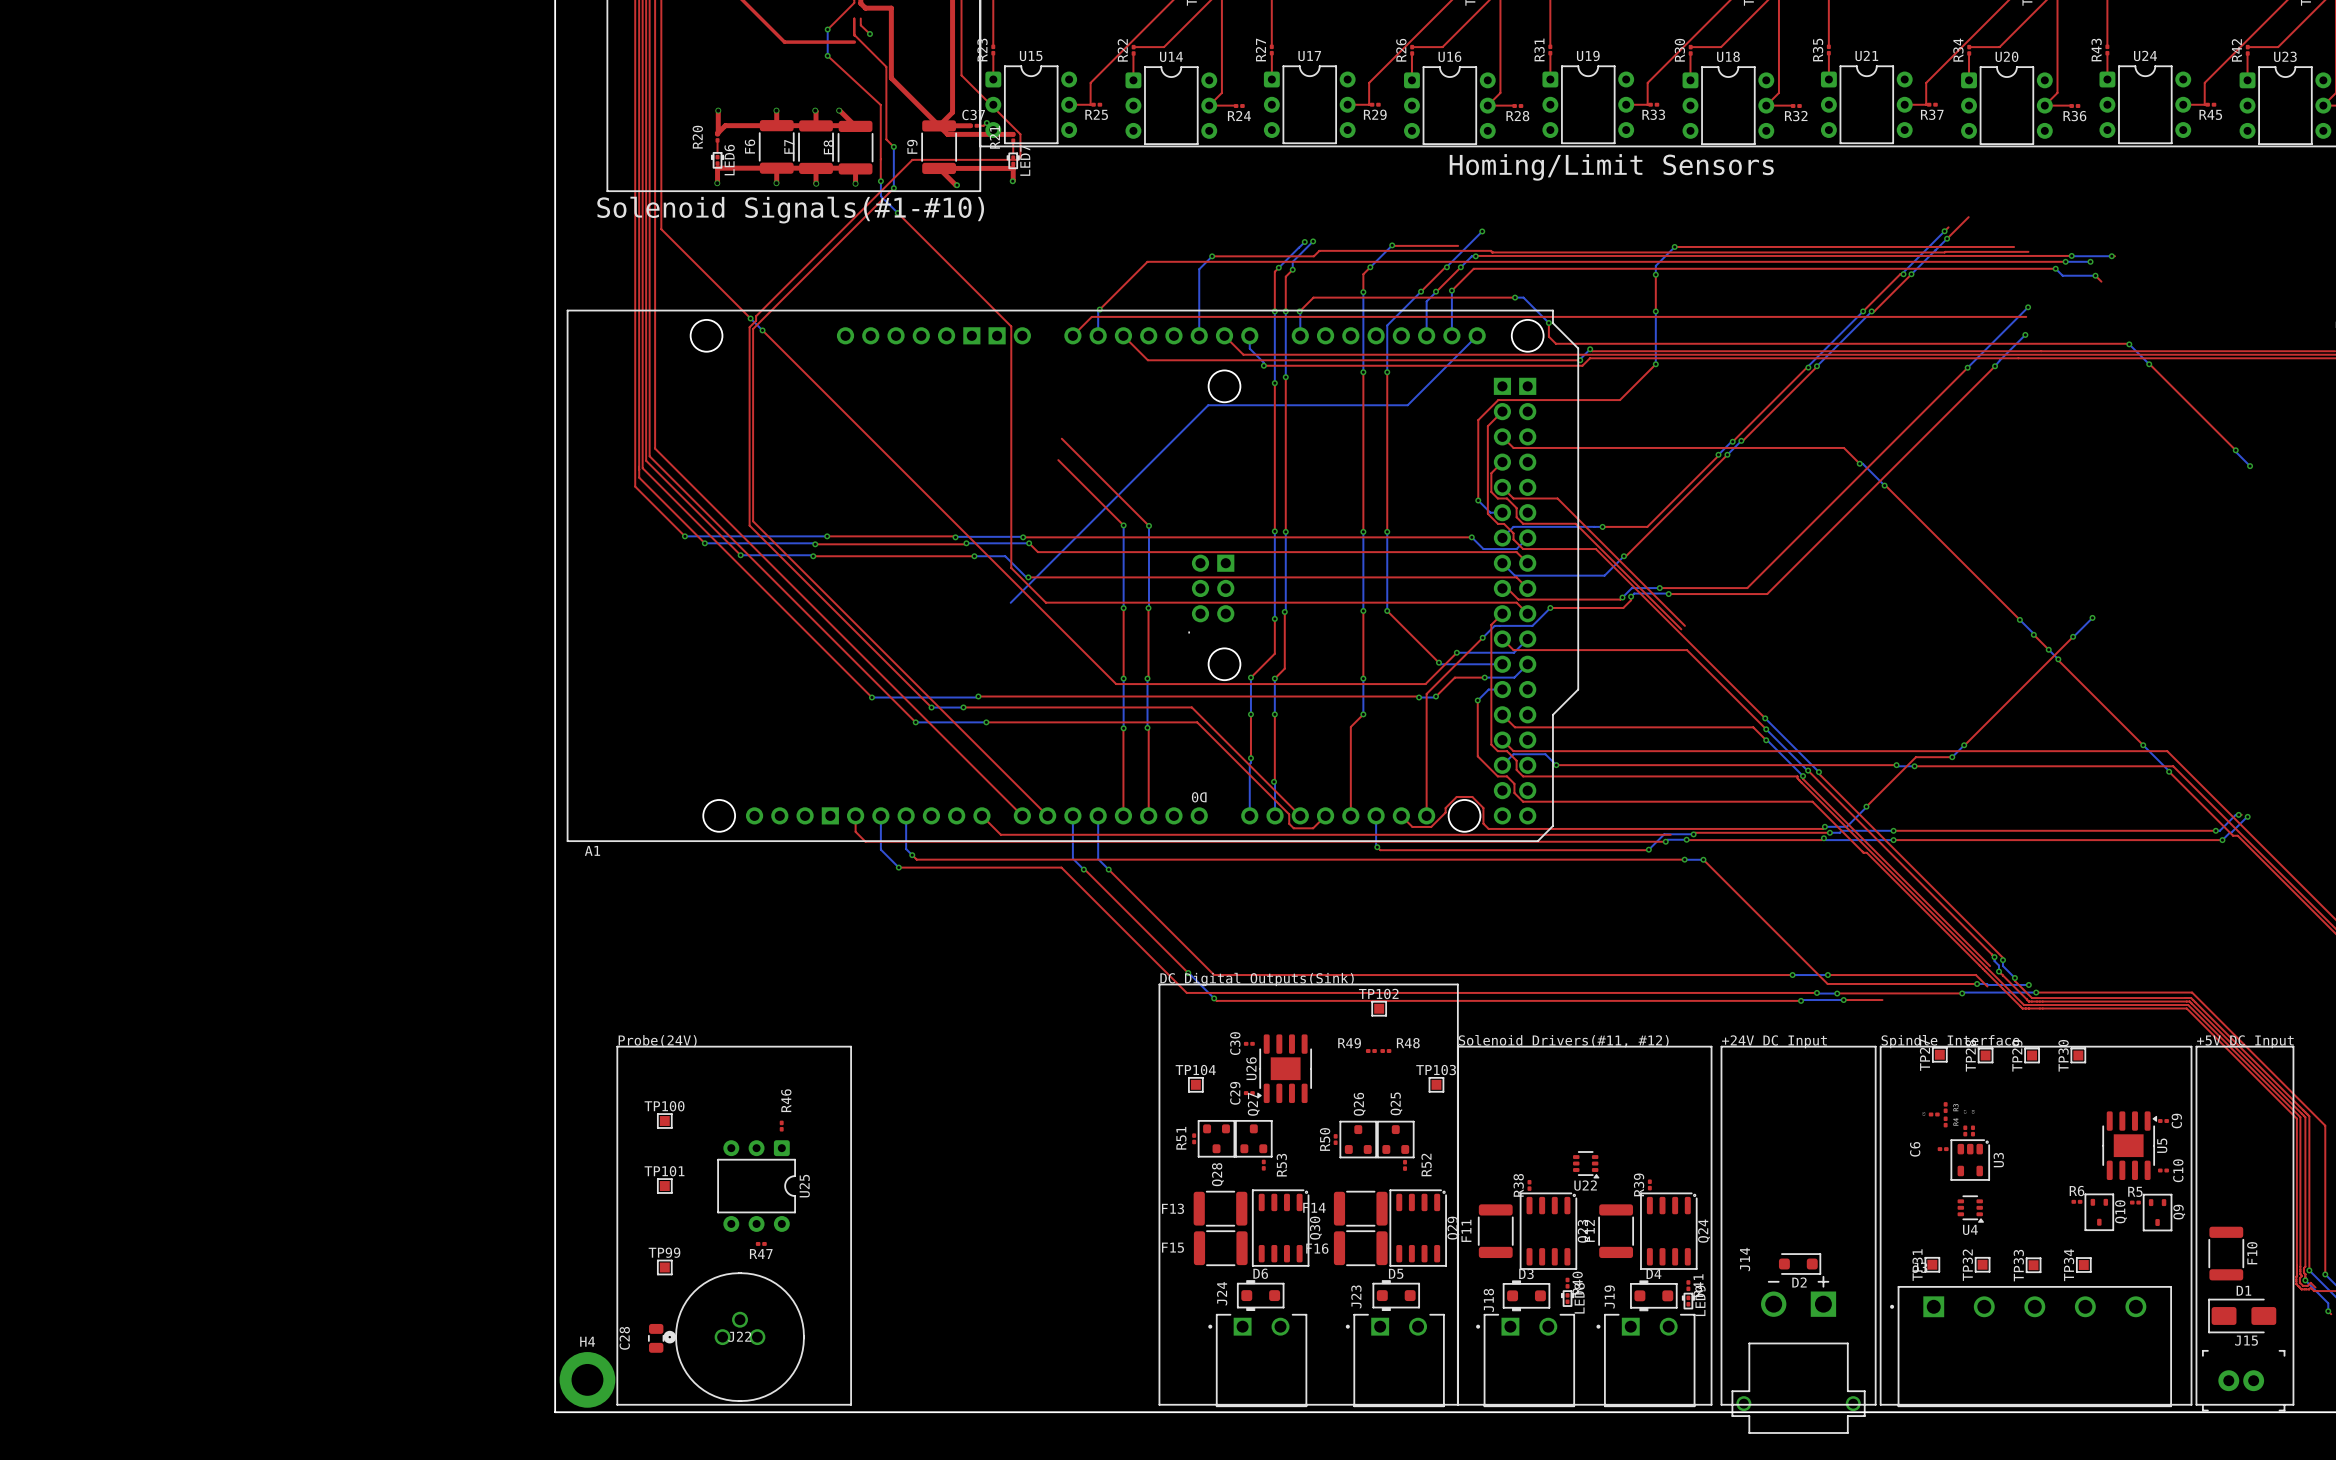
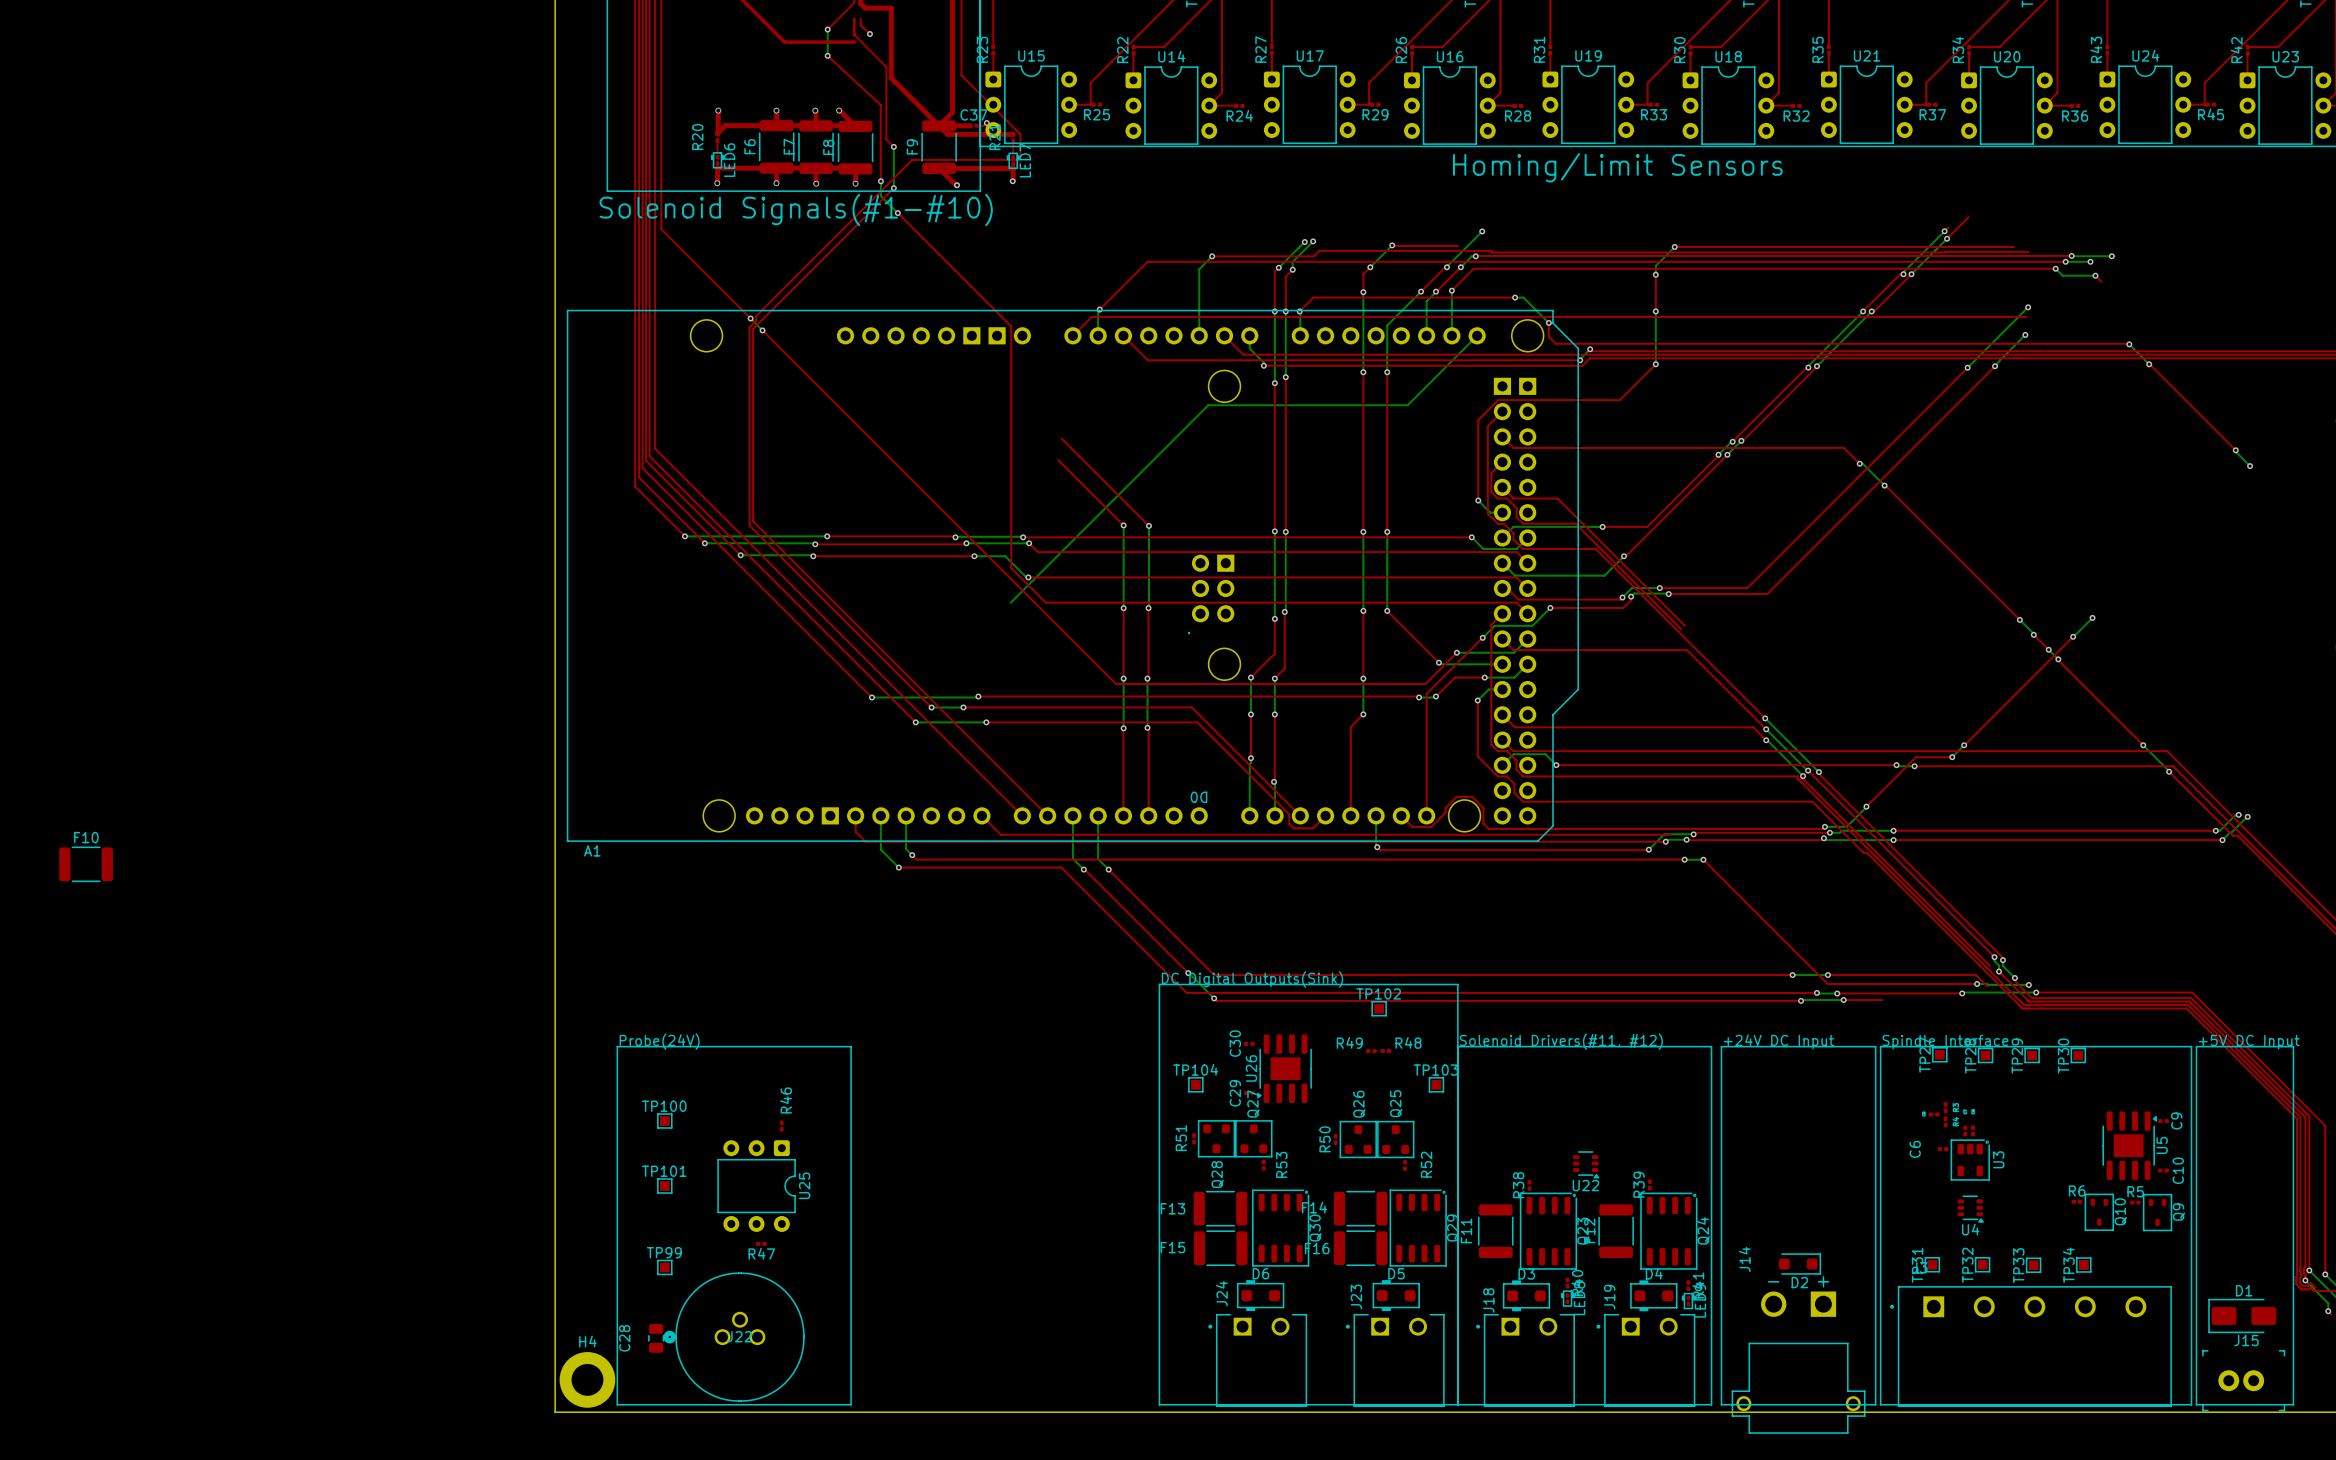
F10 rotation: 0° (2226, 1253) -> 90° clockwise (86, 864)
F10 position: (2226, 1253) -> (86, 864)
F10 name position: F10 (2252, 1253) -> F10 (86, 837)

